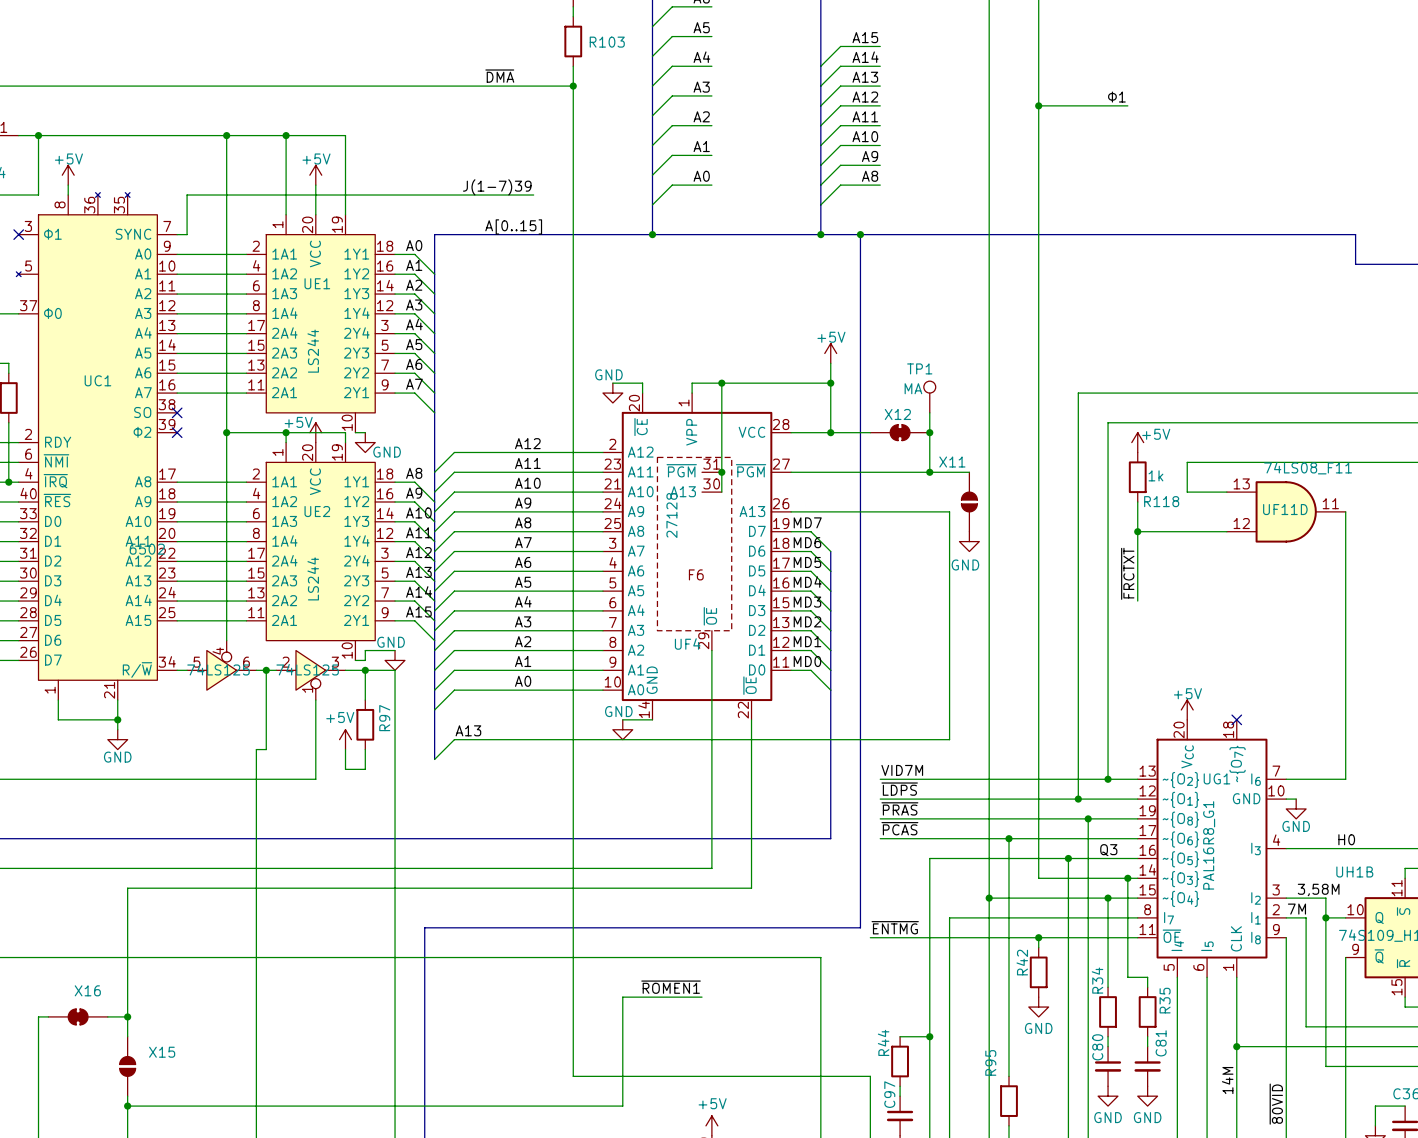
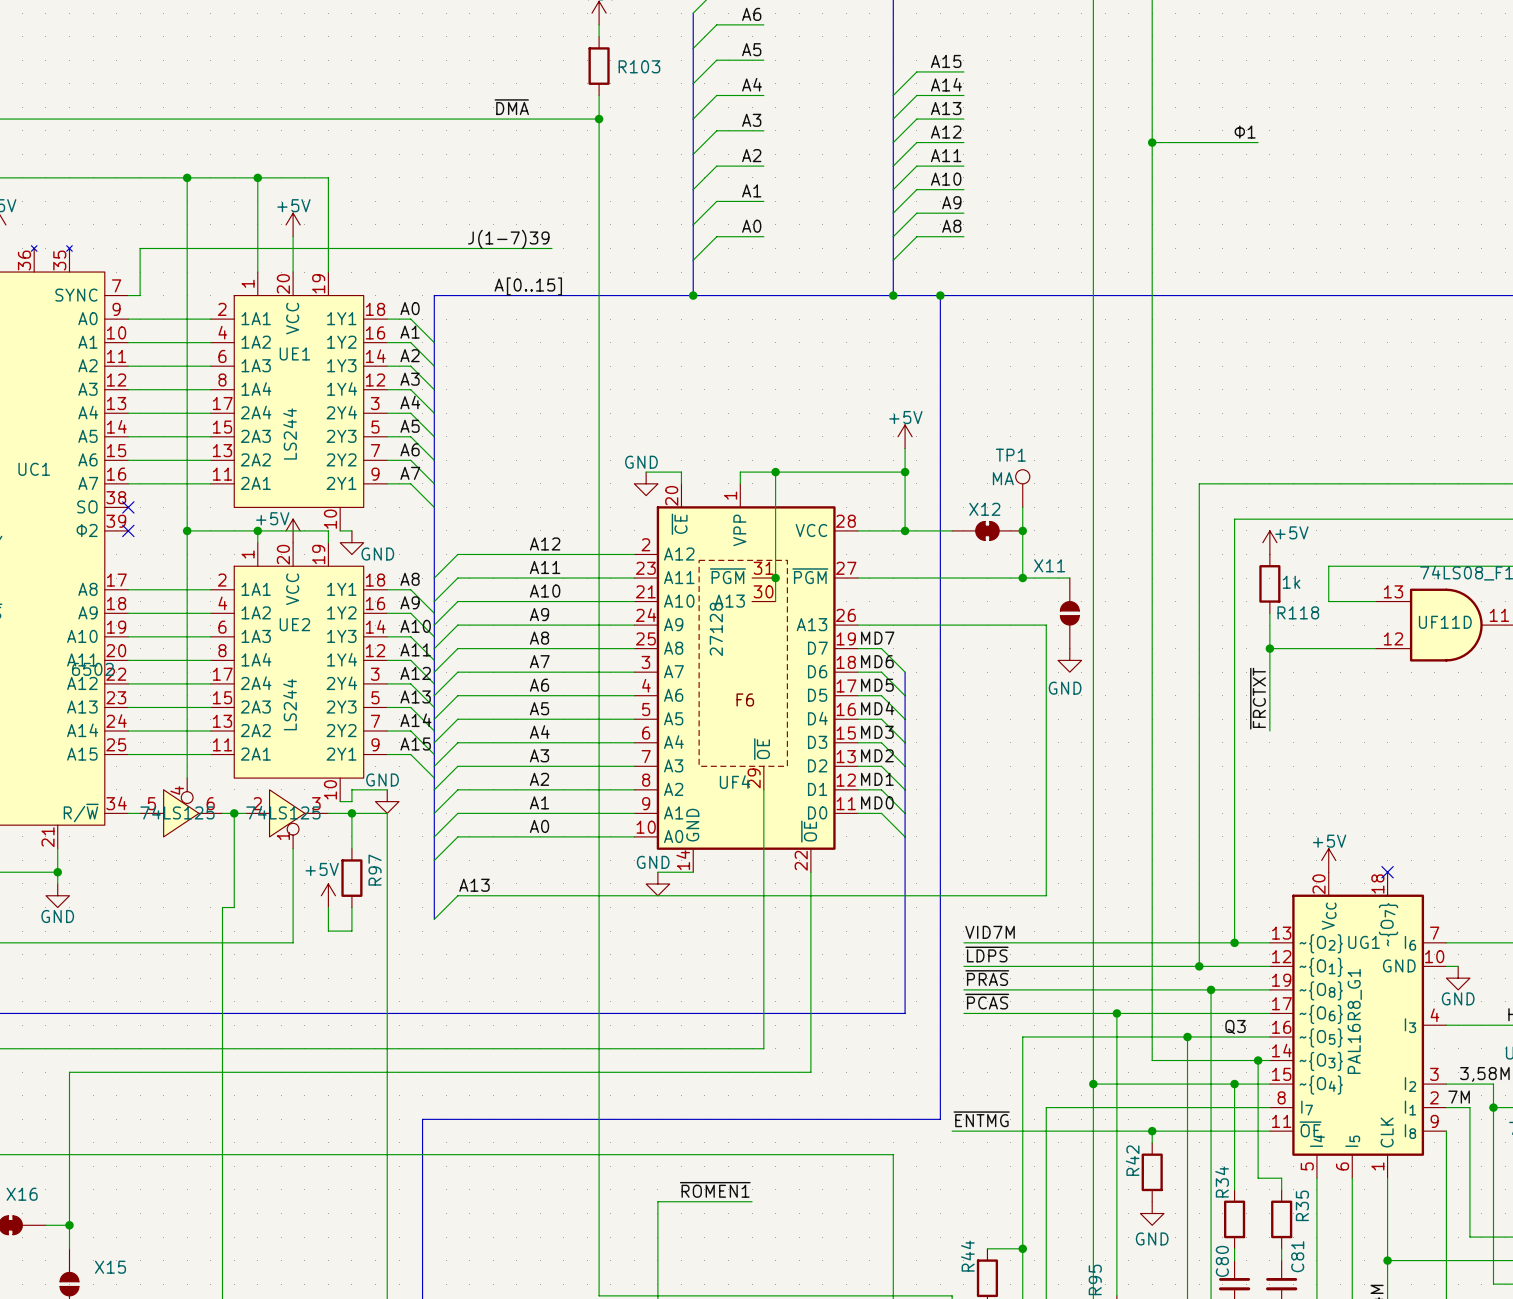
UF4 symbol: [602, 393, 792, 720] -> [634, 483, 858, 873]
UG1 symbol: [1137, 719, 1287, 978] -> [1269, 872, 1447, 1179]

